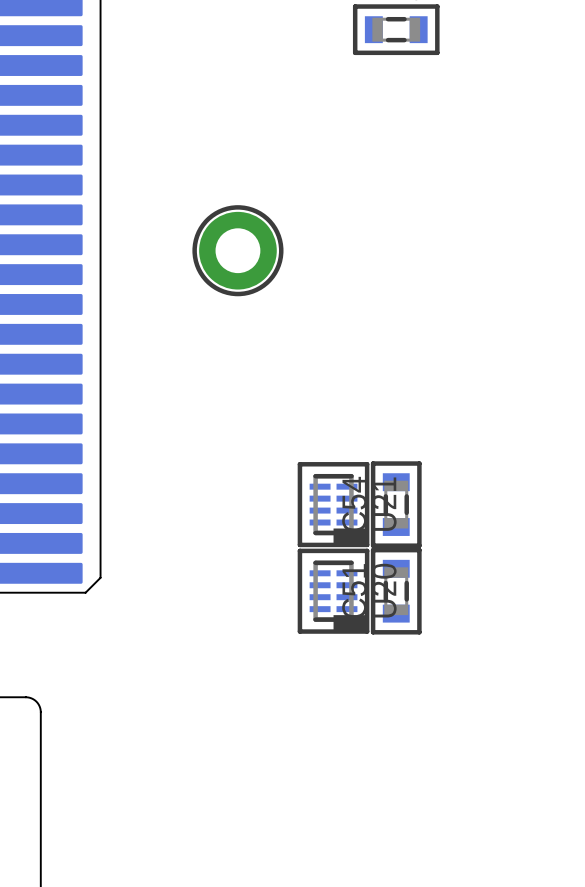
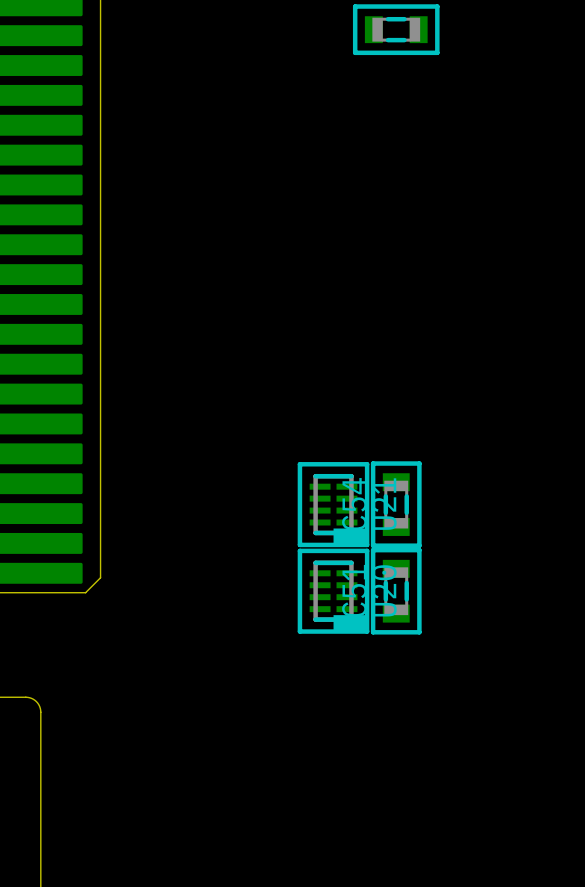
part: (237, 250) -> none

